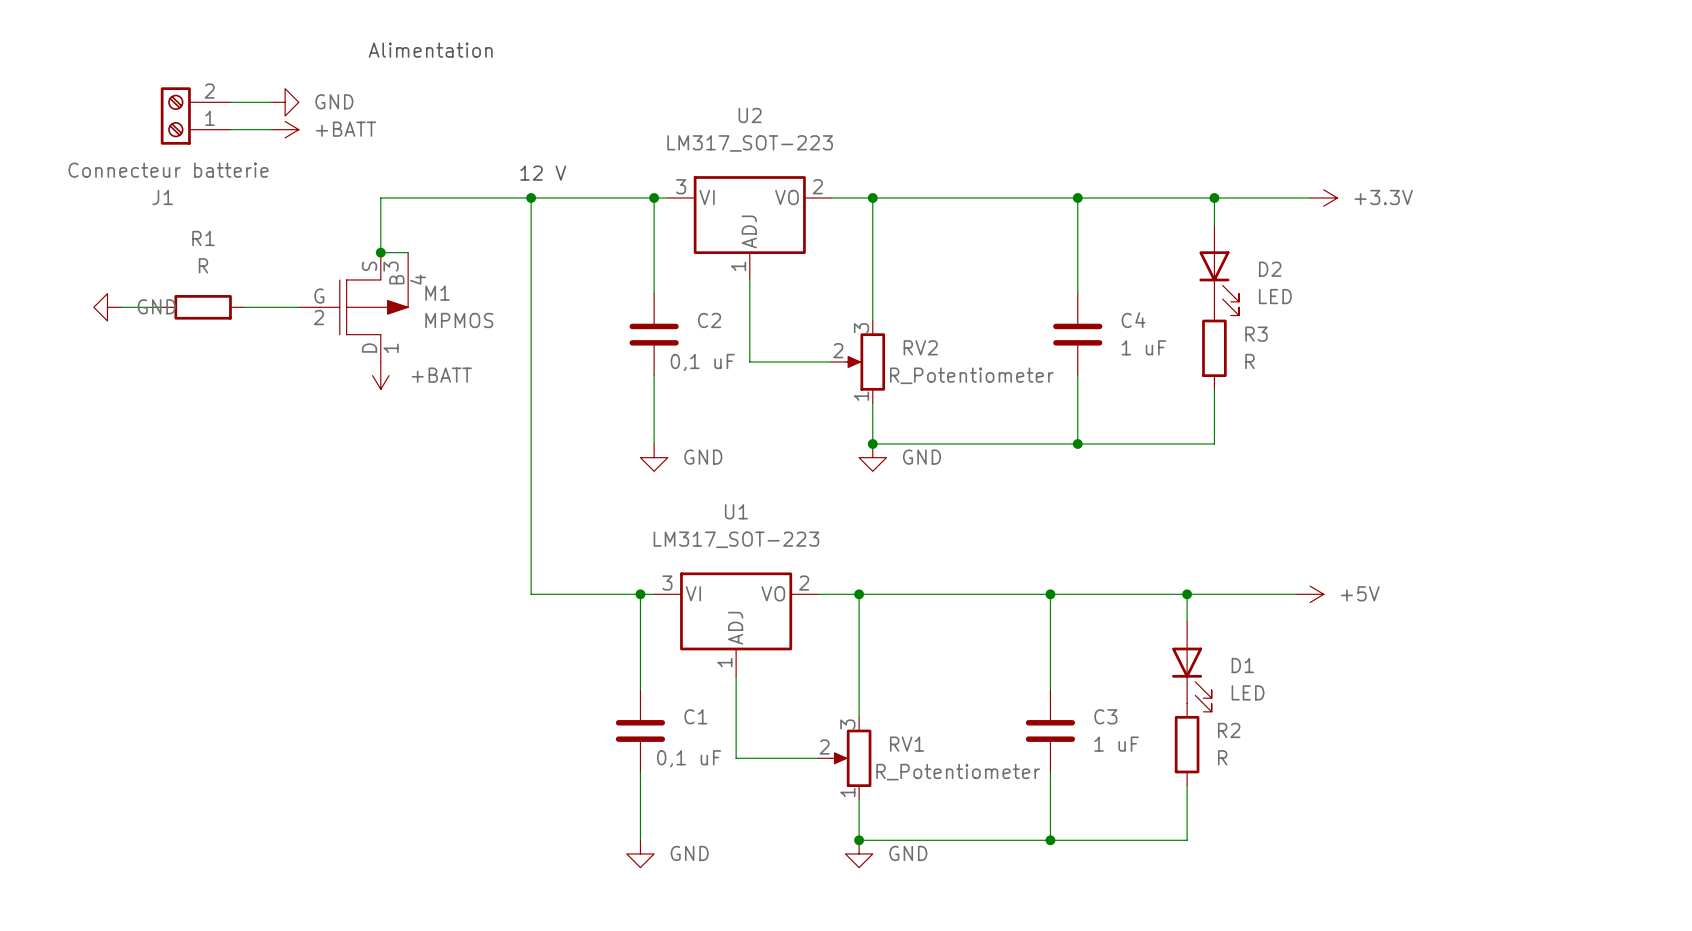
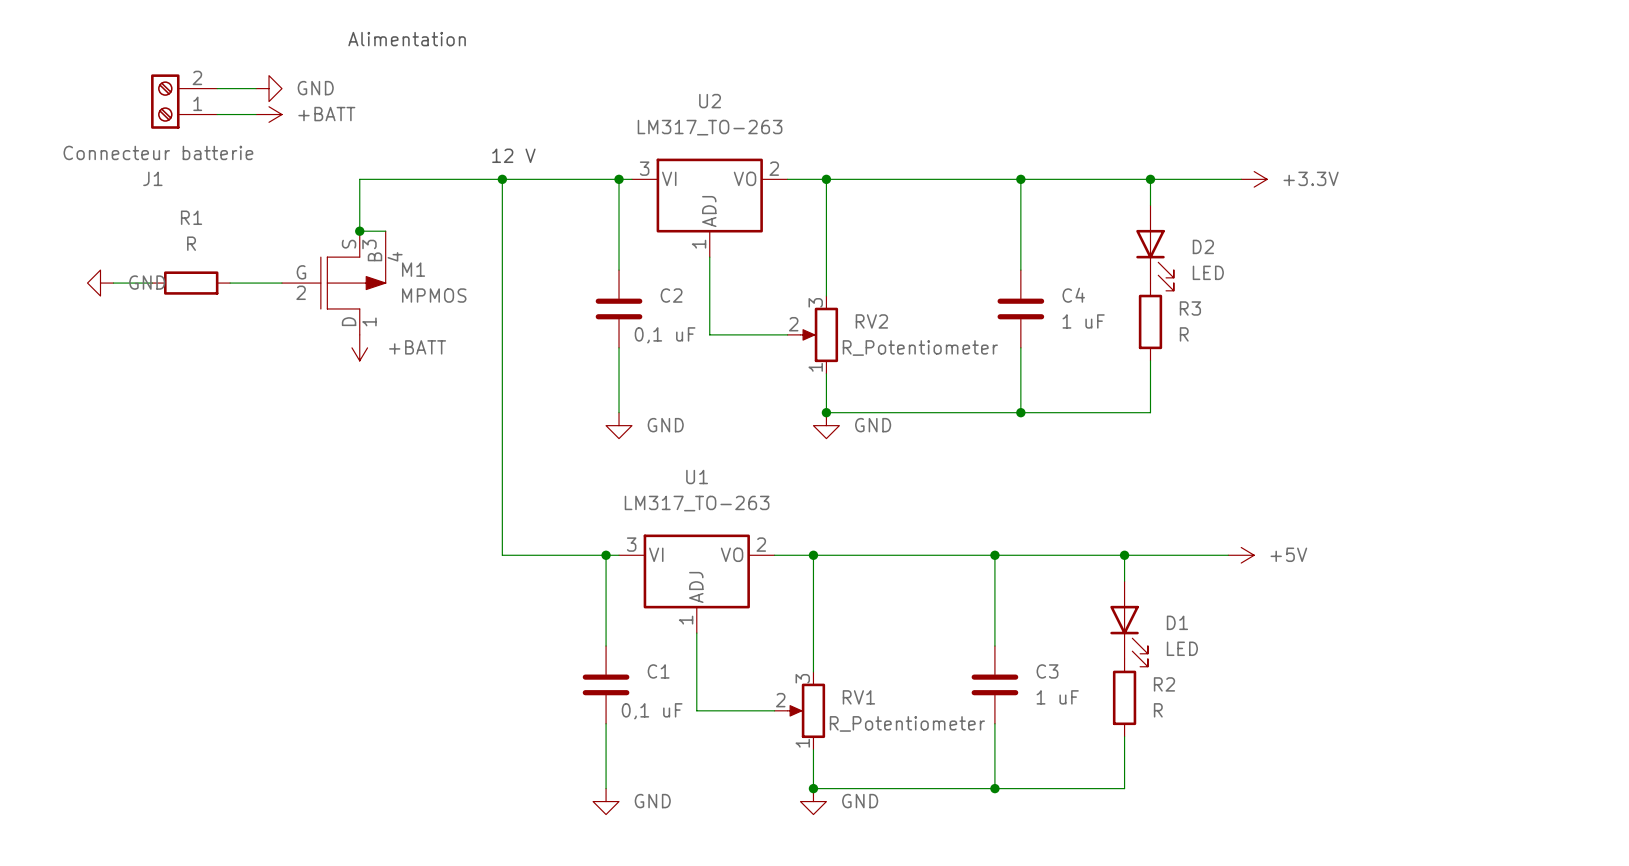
U2 value: LM317_SOT-223 (750, 143) -> LM317_TO-263 (710, 127)
U1 value: LM317_SOT-223 (736, 539) -> LM317_TO-263 (697, 503)

